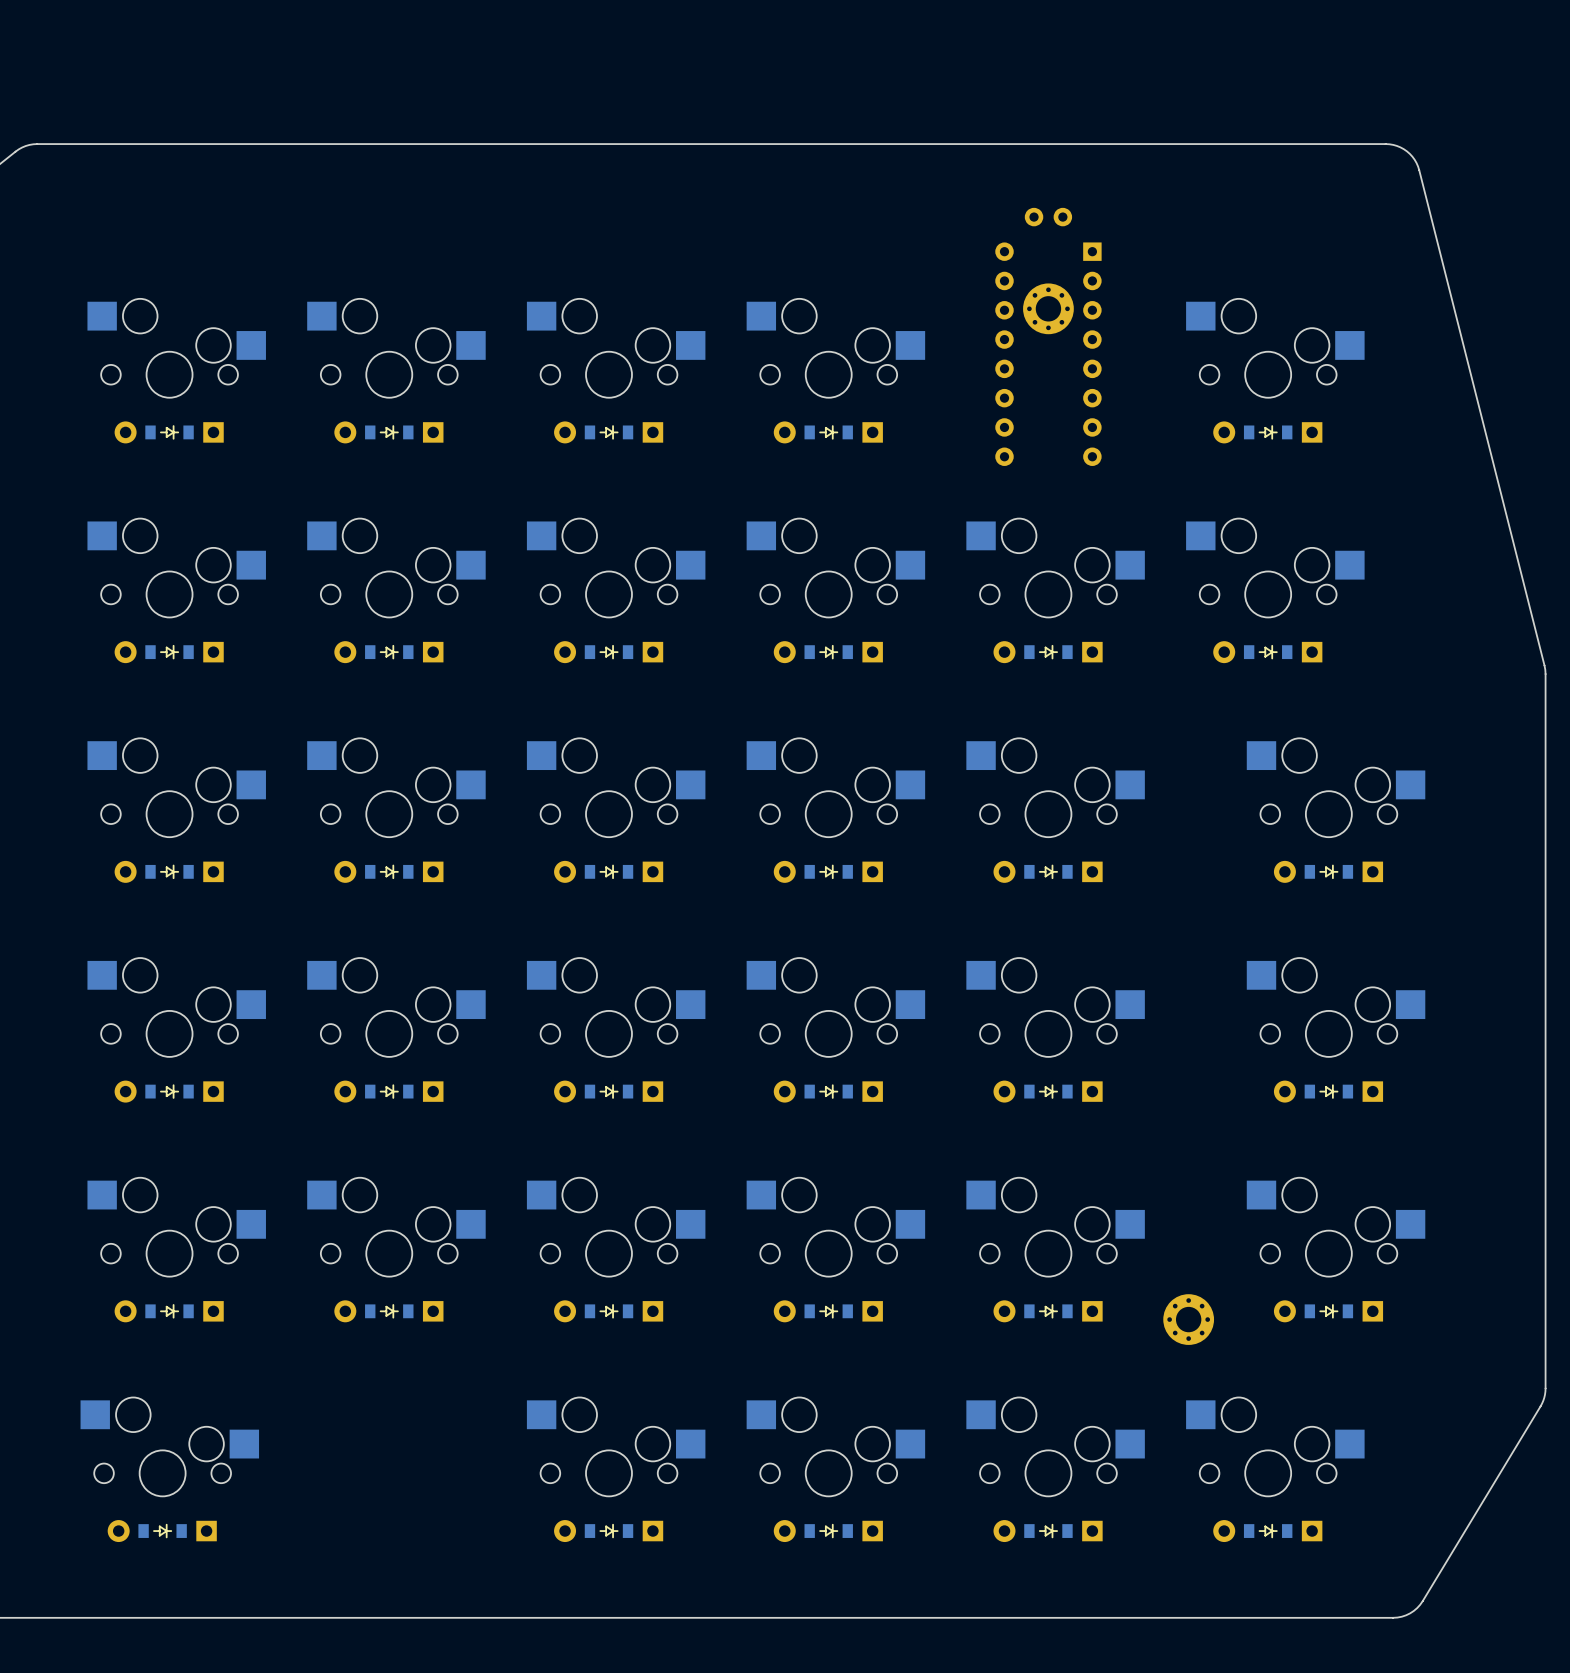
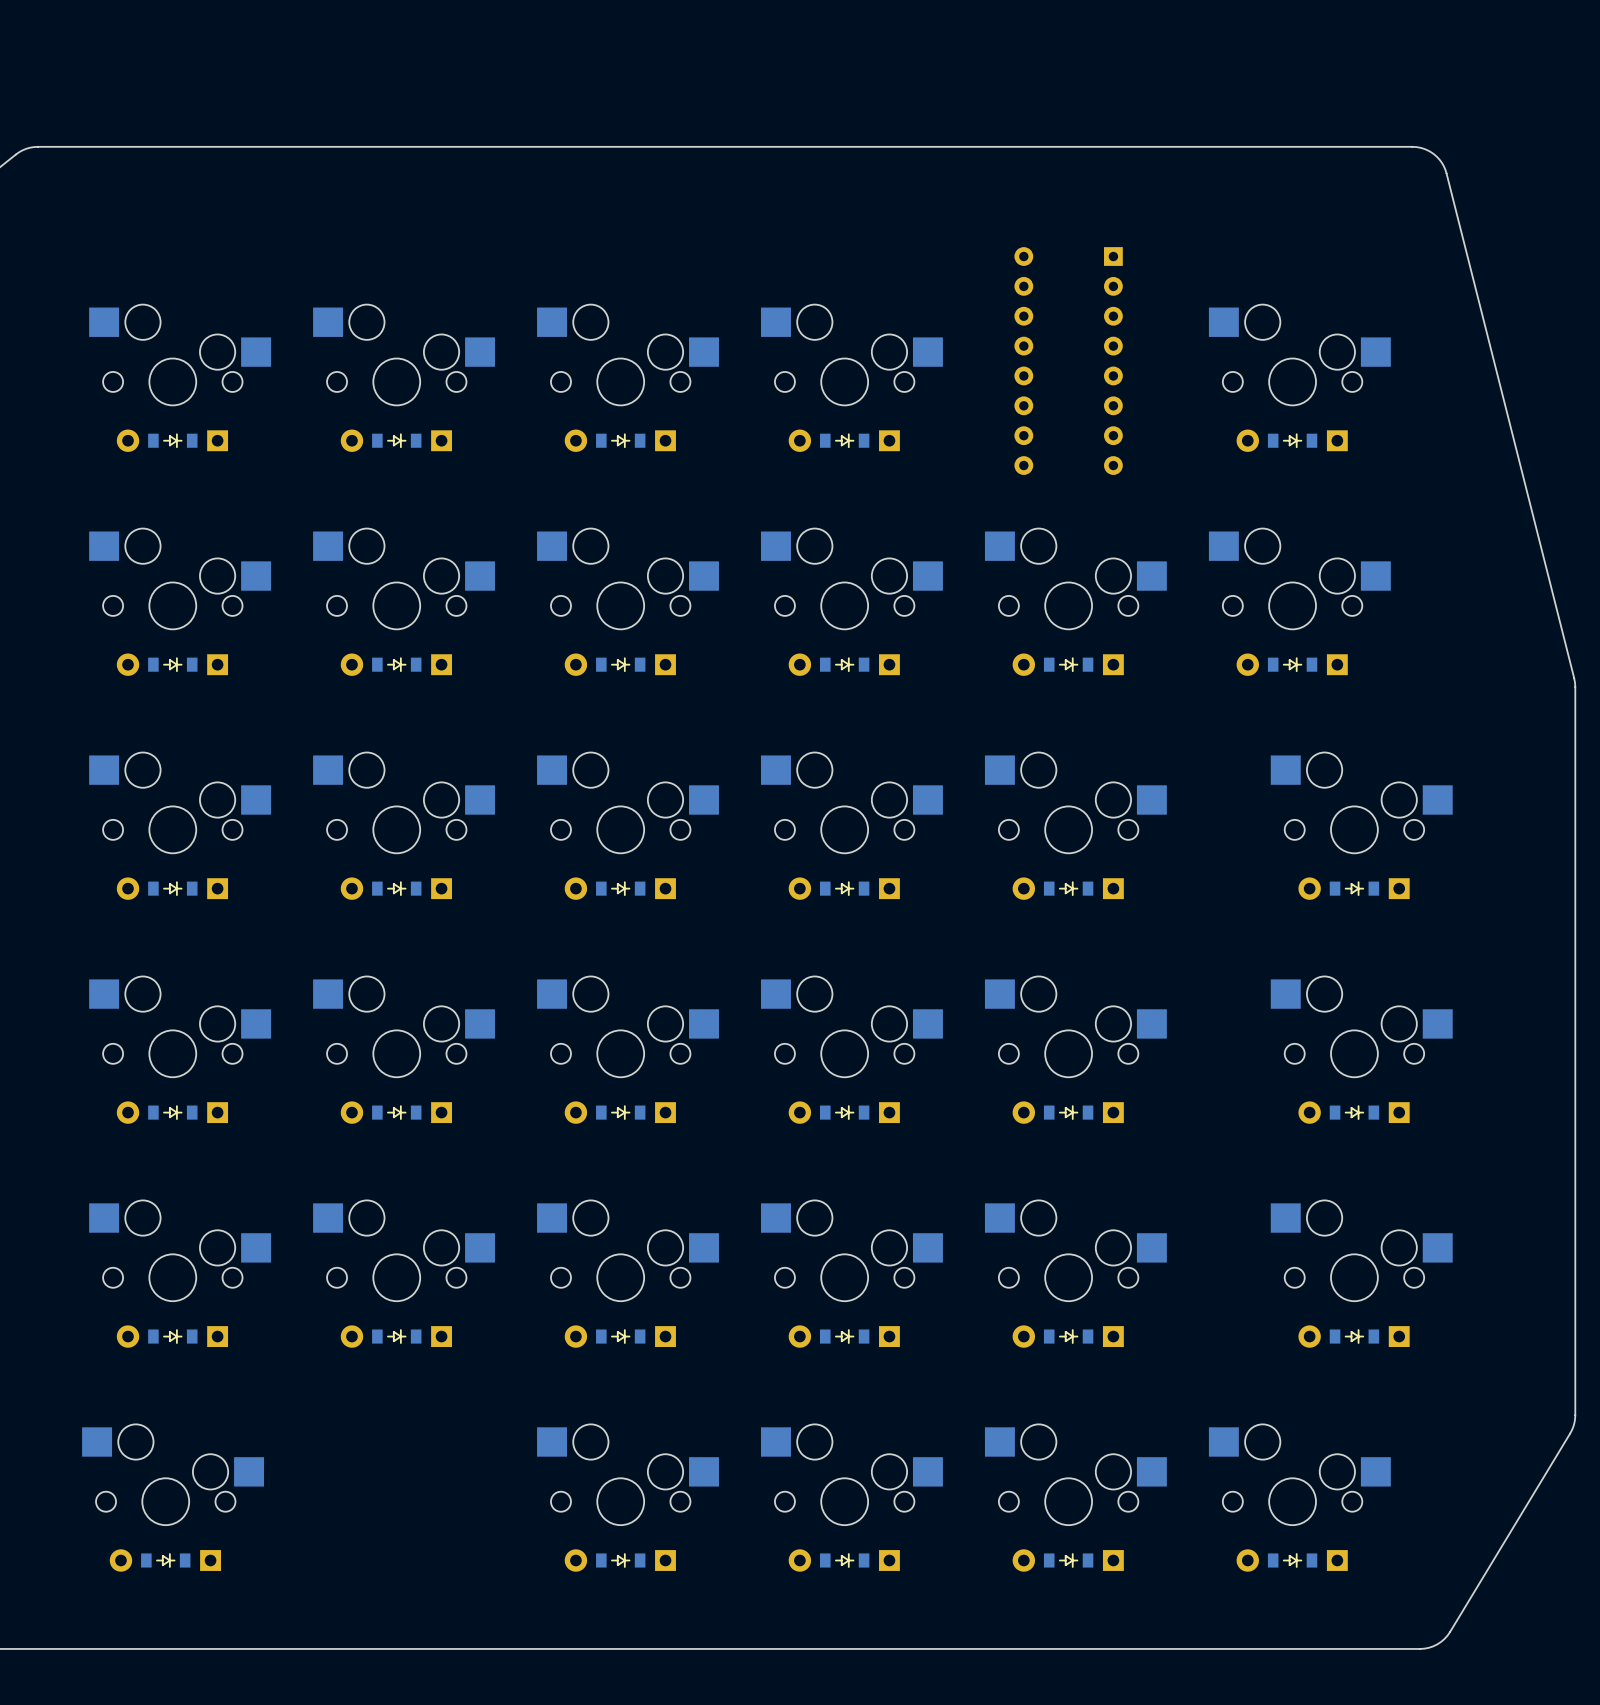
part: (1048, 217) -> none
part: (1048, 308) -> none
part: (1188, 1319) -> none

